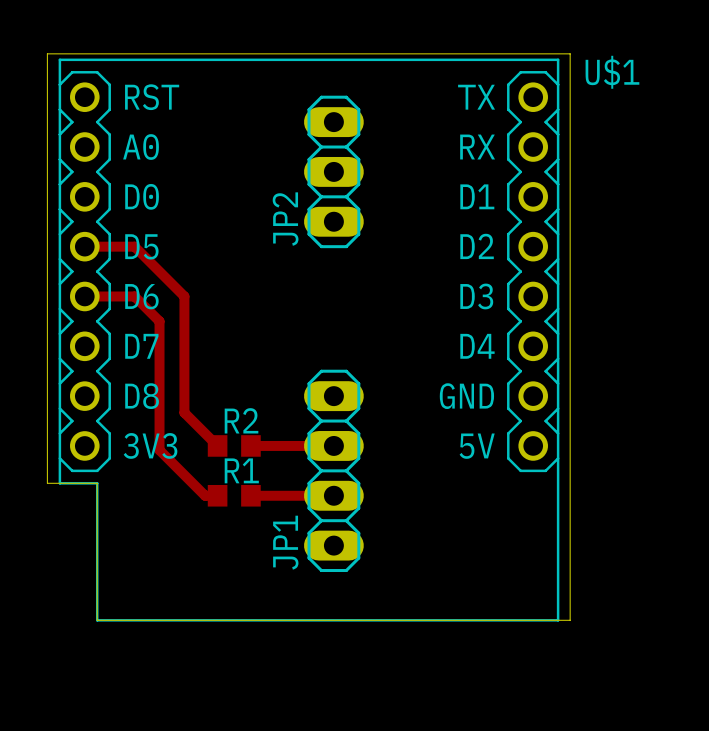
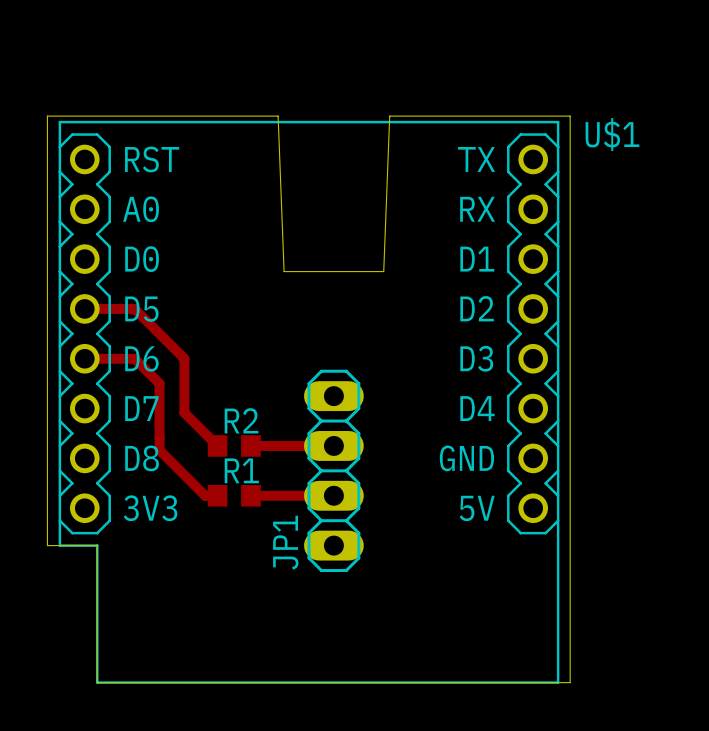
board edge: (47, 116) (47, 53) (570, 53) (570, 116) -> (47, 116) (278, 116) (284, 271) (383, 271) (389, 116) (570, 116)
JP2: (333, 171) -> none
top track: (84, 246) (134, 246) (184, 296) (184, 358) -> (84, 308) (134, 308) (184, 358)
top track: (84, 296) (134, 296) (159, 321) (159, 383) -> (84, 358) (134, 358) (159, 383)
U$1 position: (309, 340) -> (309, 402)
board edge: (47, 483) (97, 483) (97, 545) -> (47, 483) (47, 545) (97, 545)
board edge: (97, 620) (570, 620) -> (97, 620) (97, 682) (570, 682) (570, 620)

